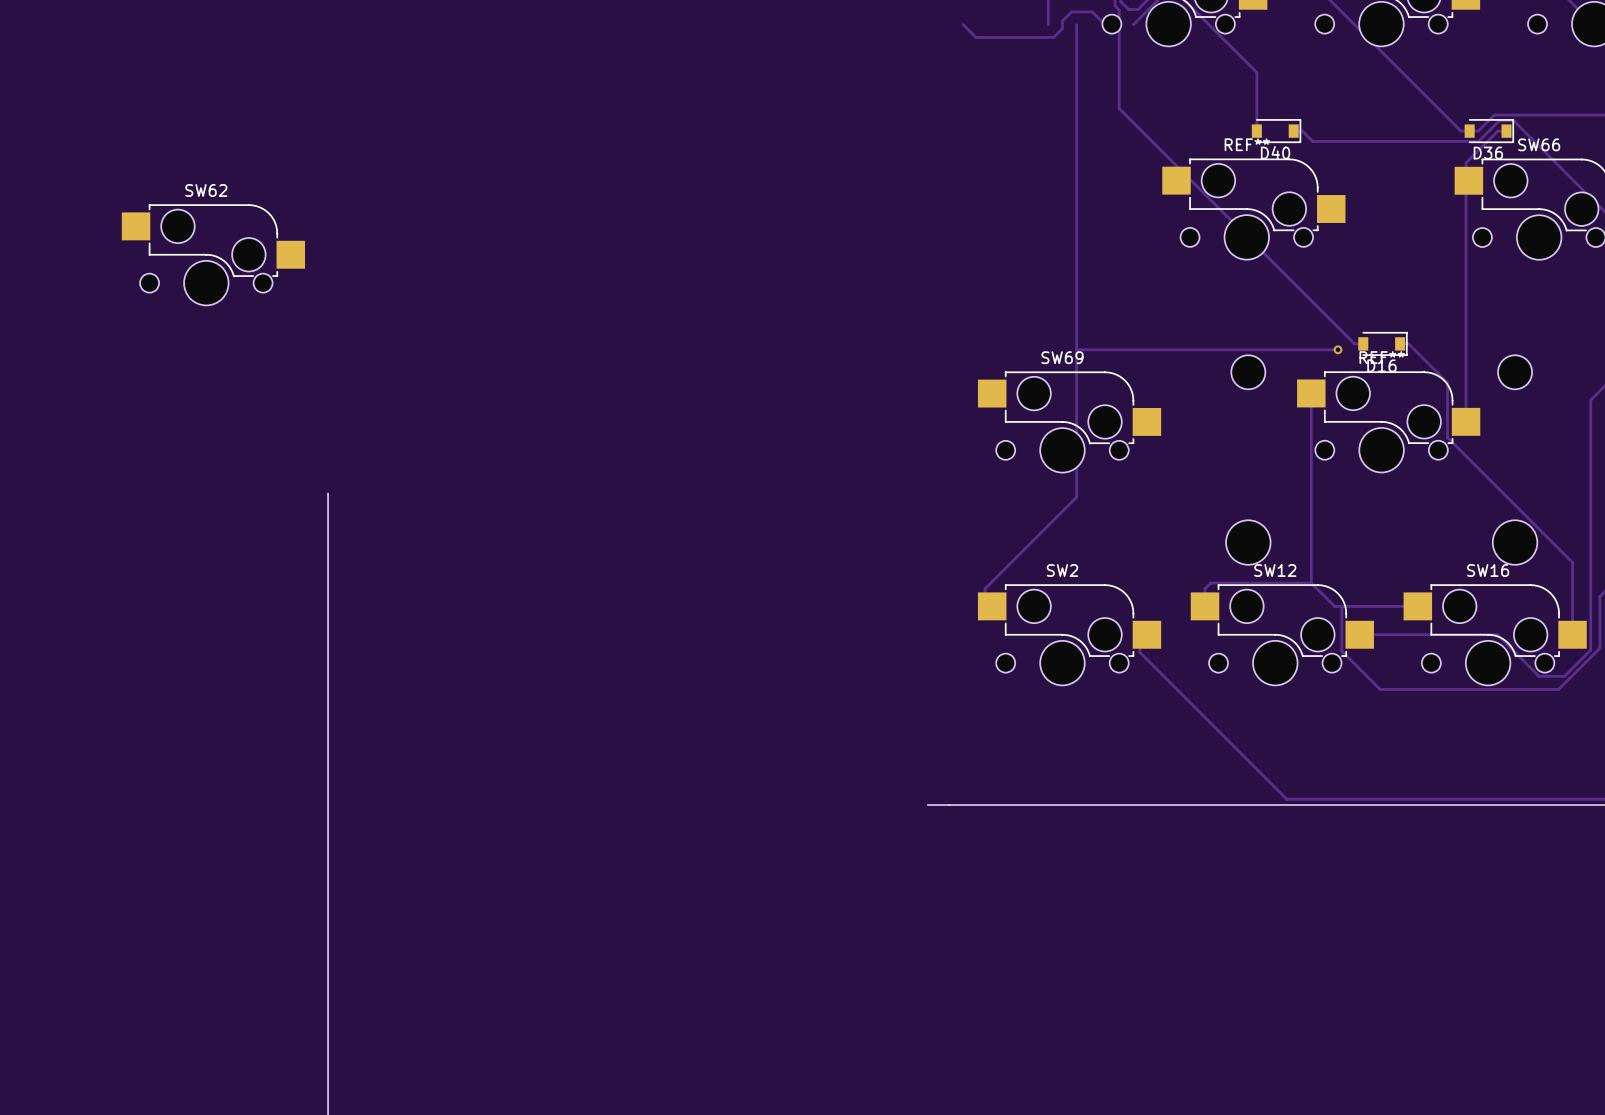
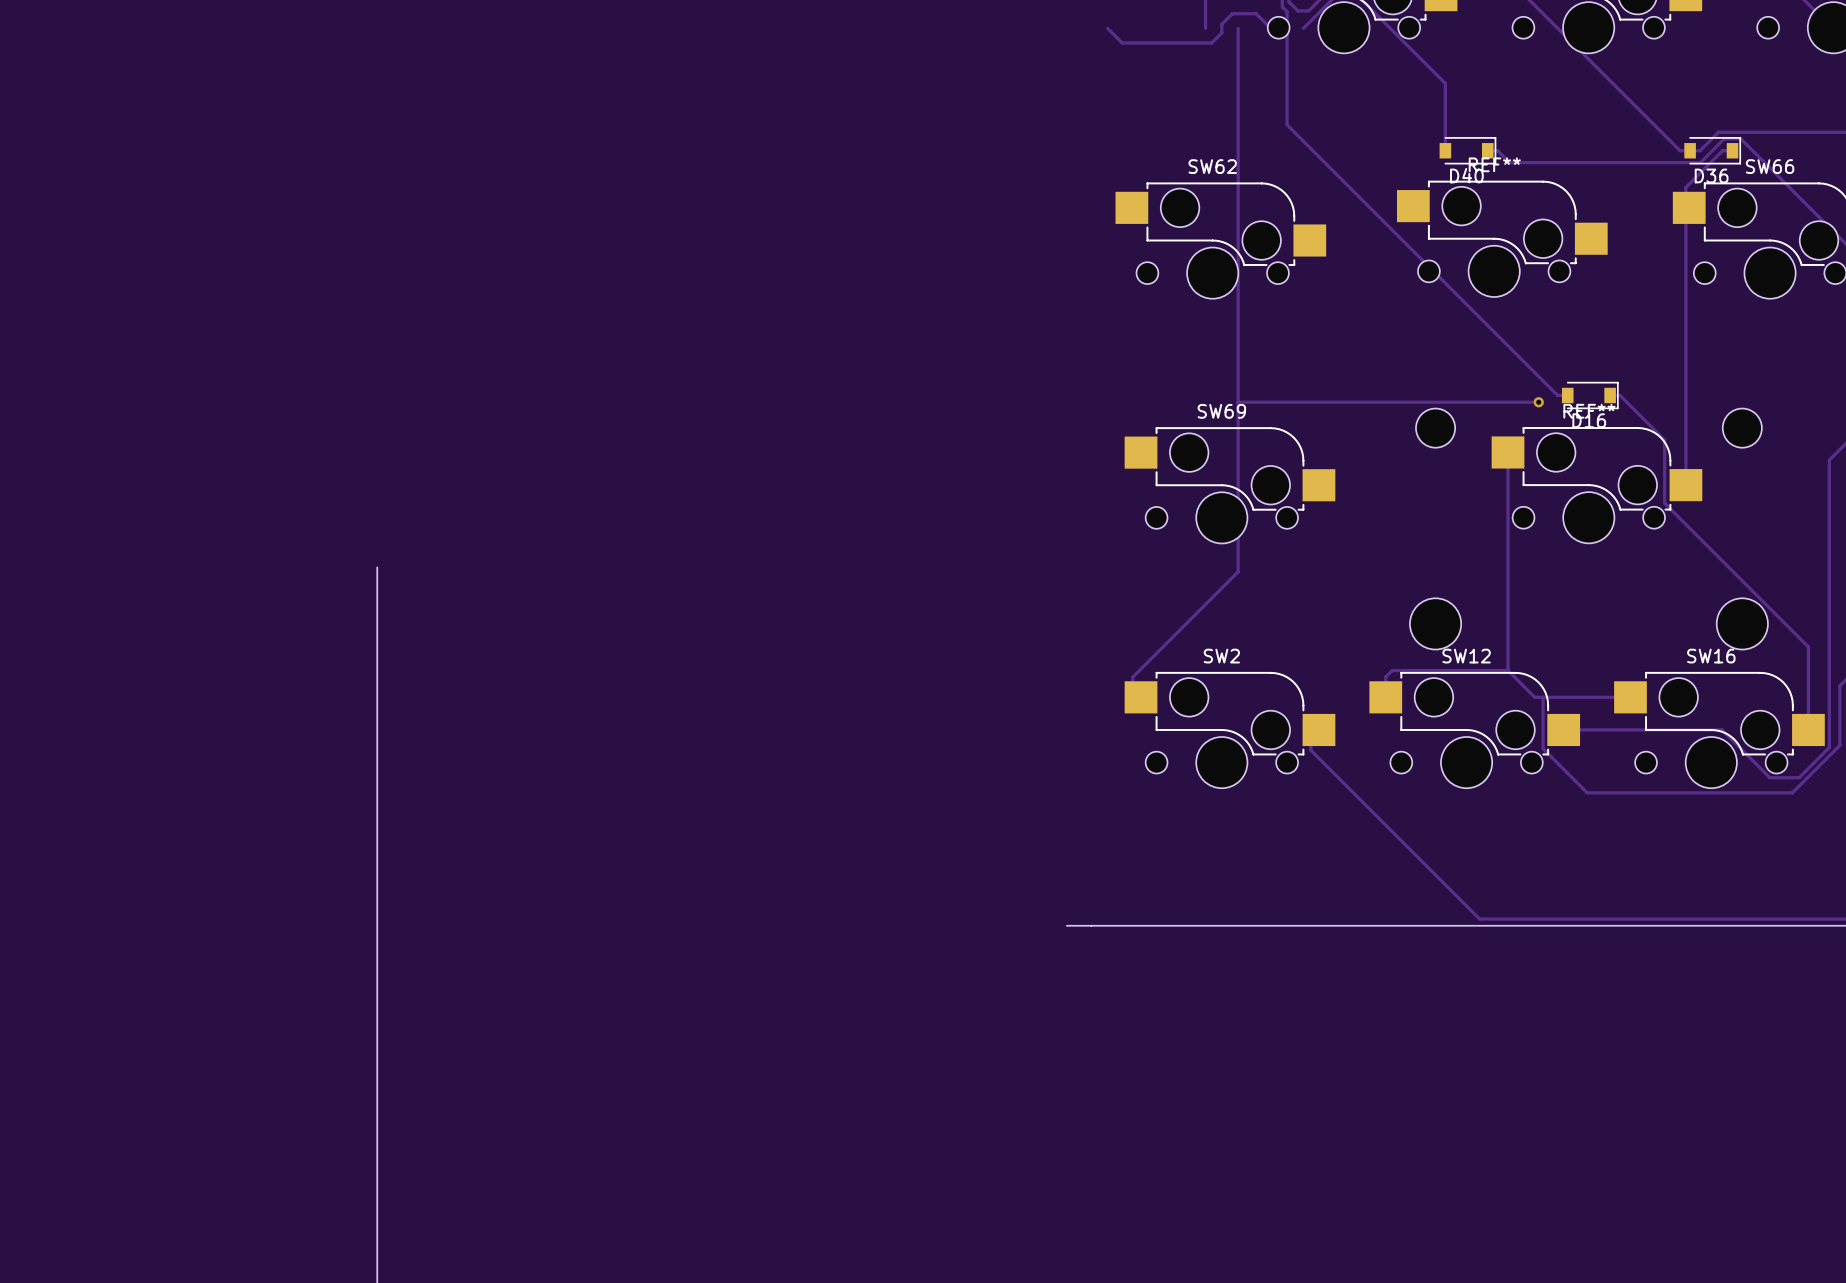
part position: (1253, 209) -> (1502, 238)
SW62 position: (213, 254) -> (1220, 240)

